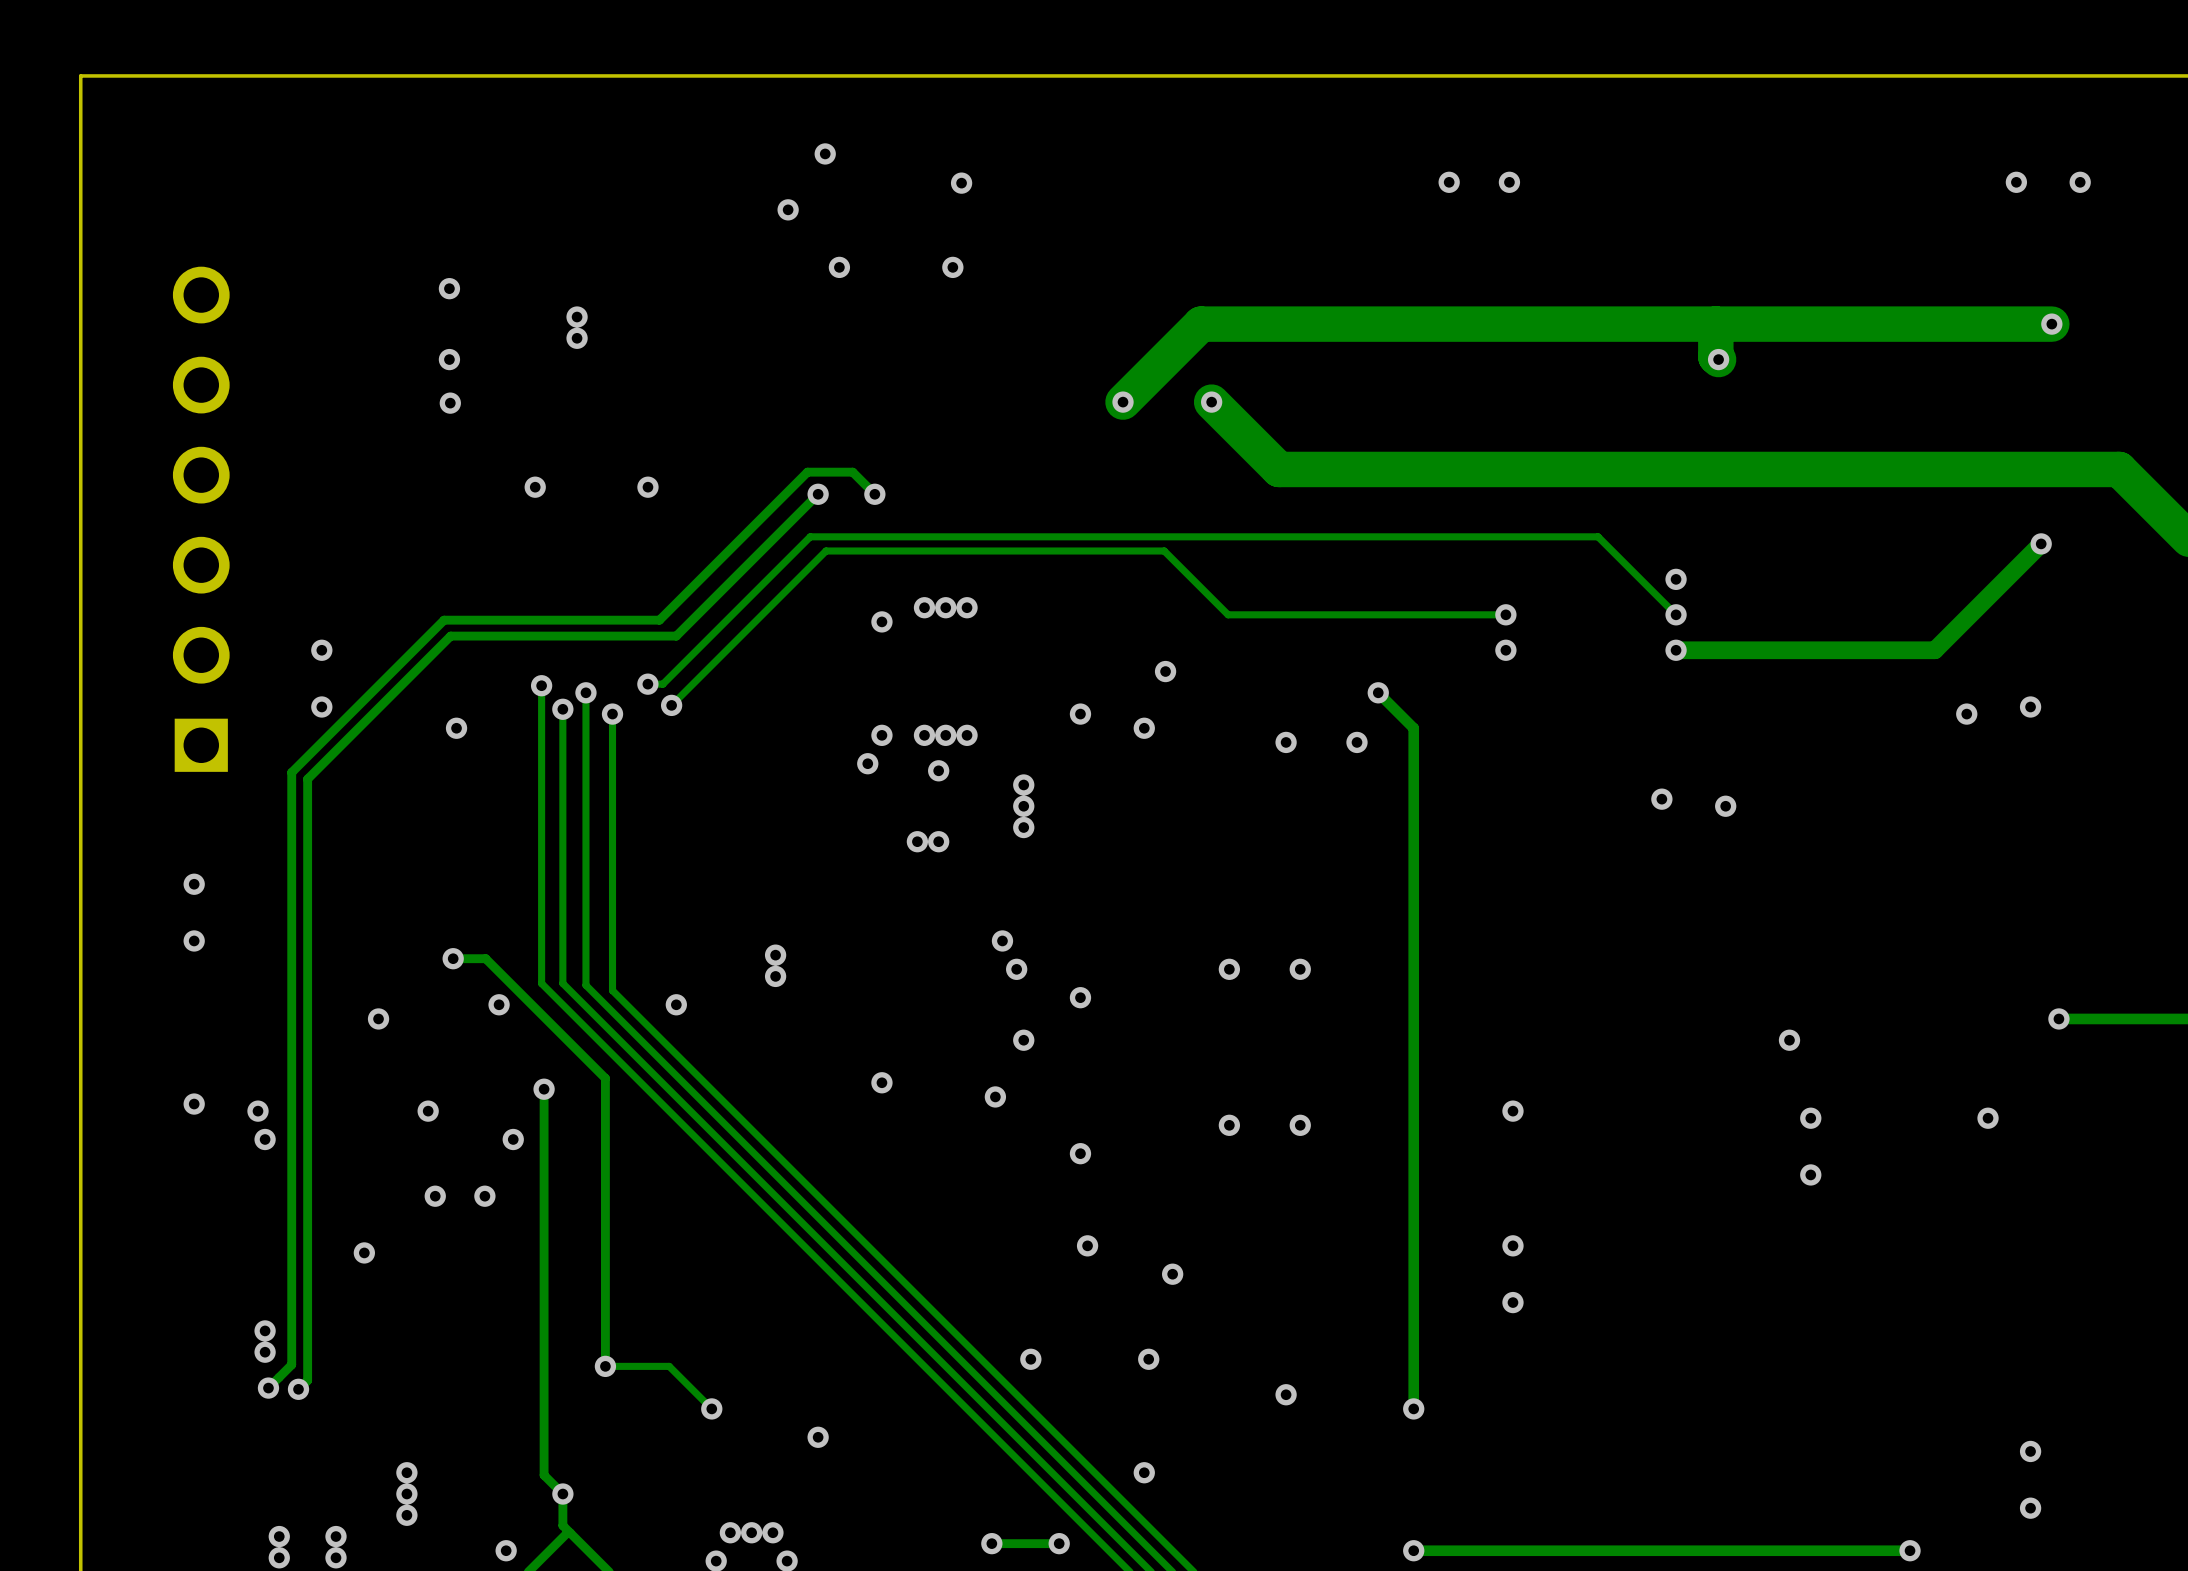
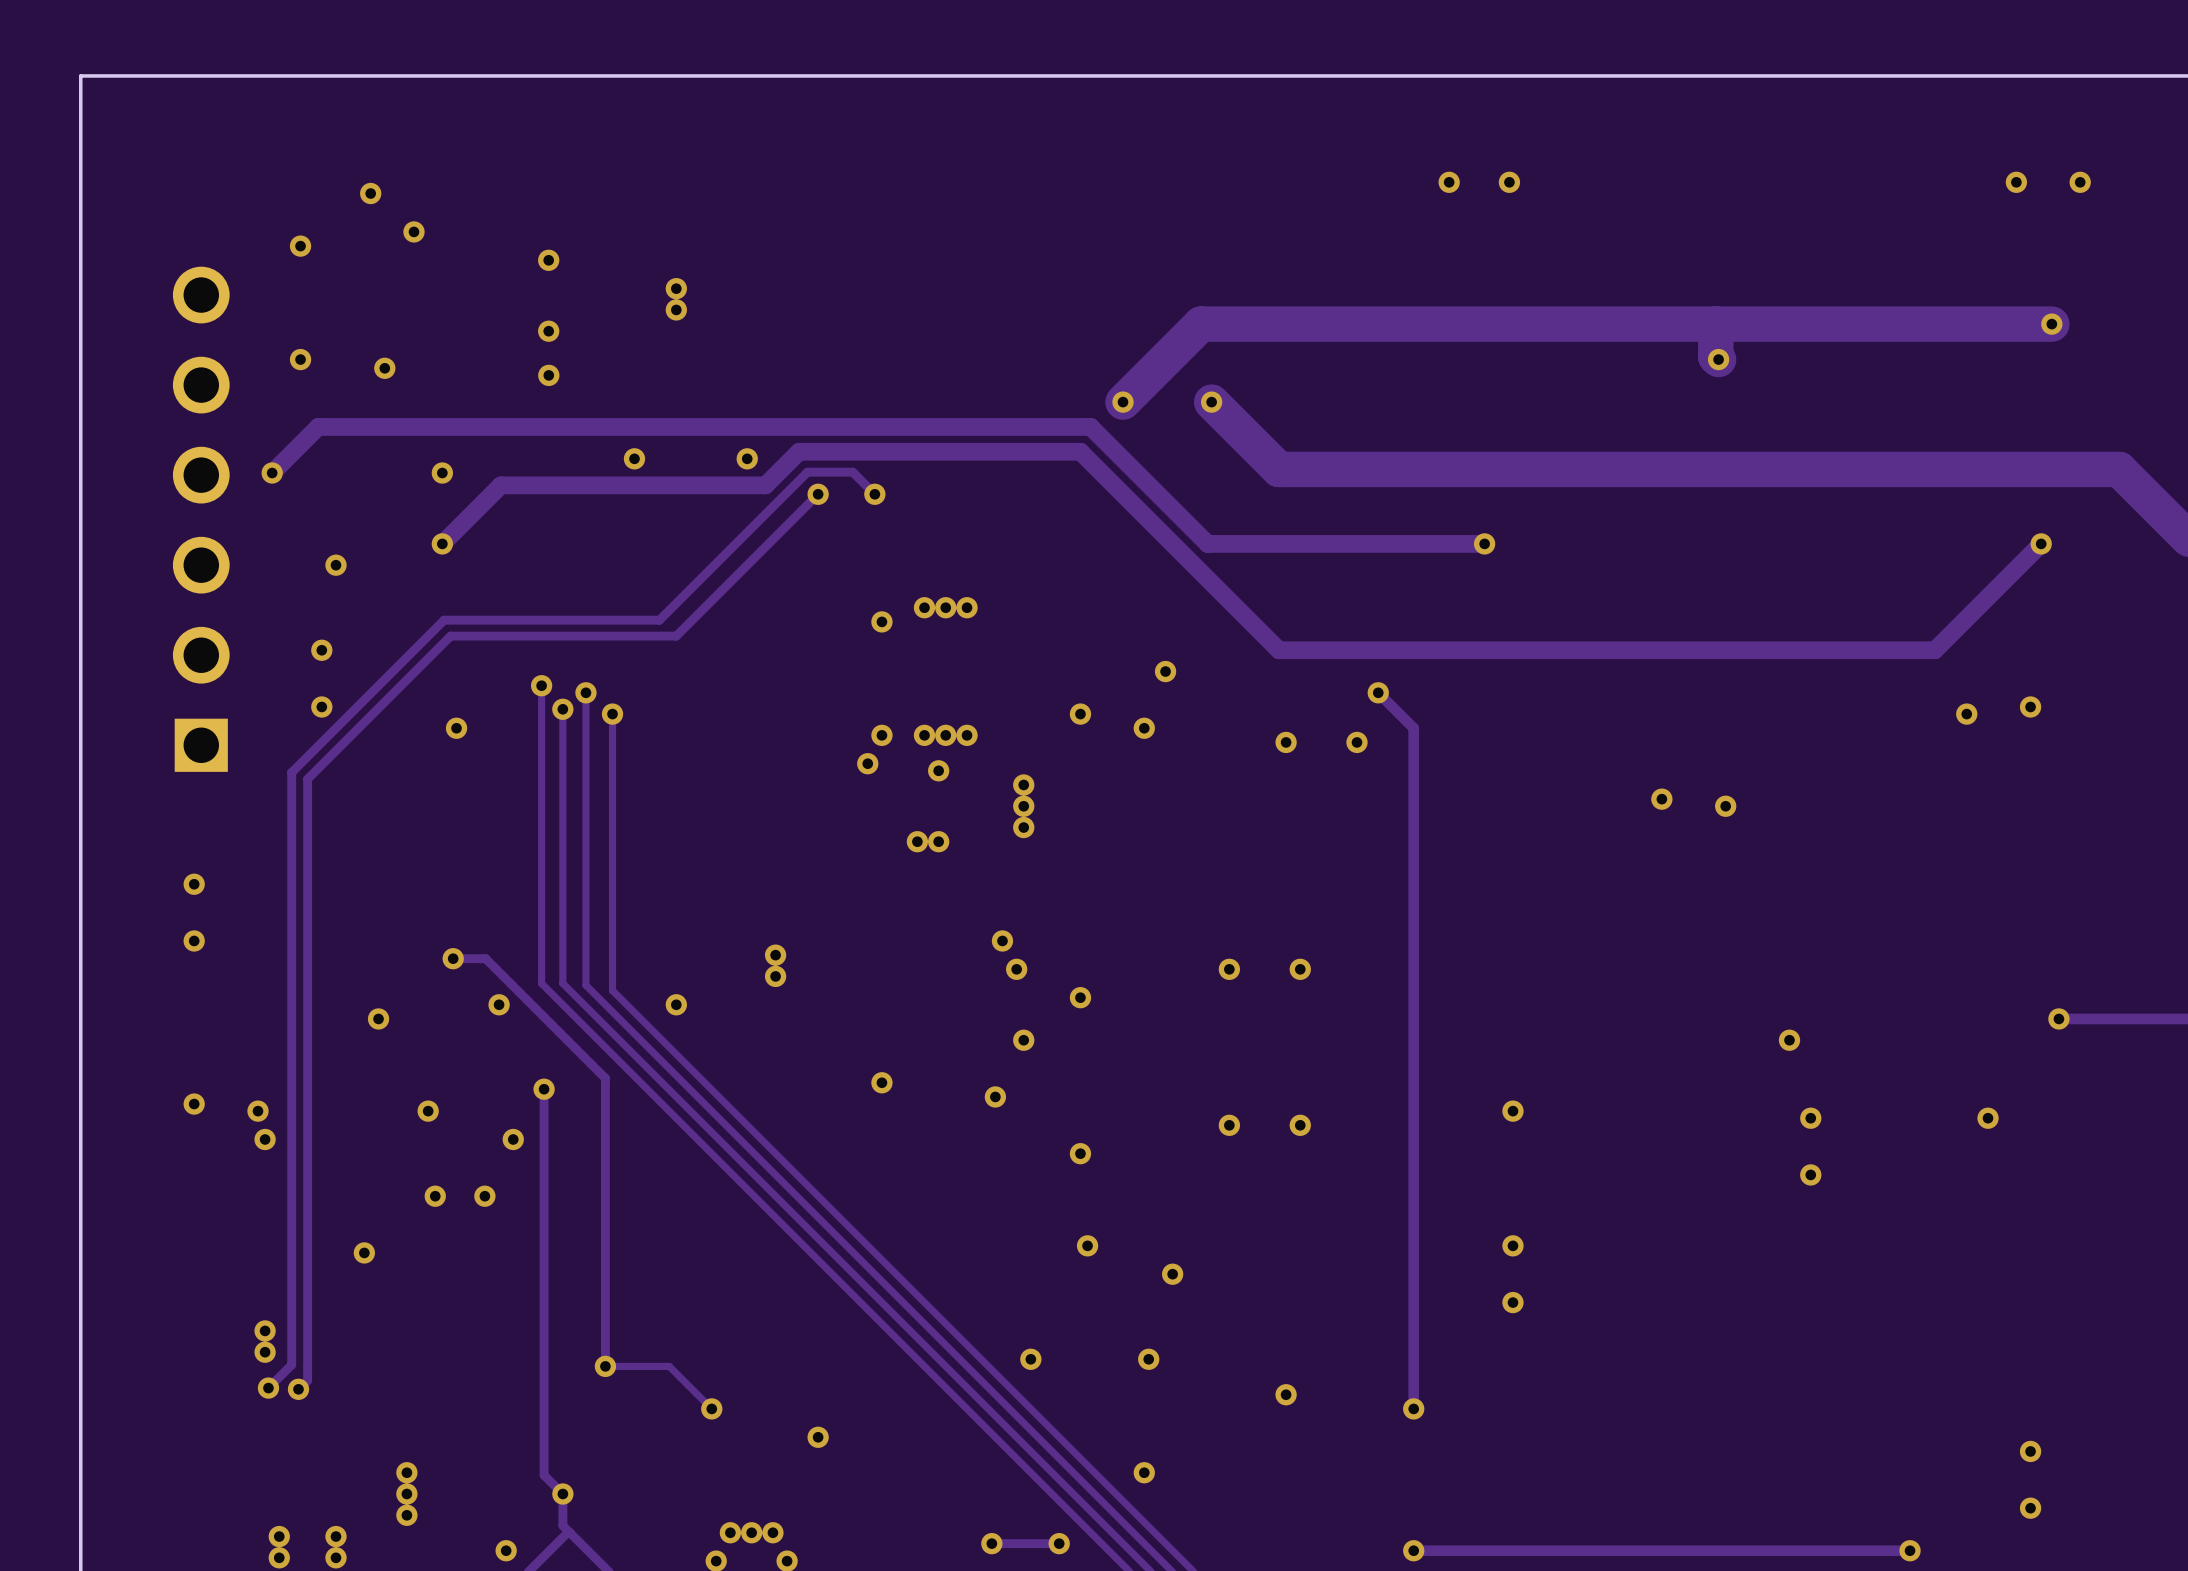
via: (825, 153) -> none
via: (961, 183) -> none
via: none -> (370, 193)
via: (788, 209) -> none
via: none -> (413, 231)
via: none -> (300, 246)
via: none -> (548, 260)
via: (839, 267) -> none
via: (952, 267) -> none
via: (449, 288) -> none
via: none -> (676, 288)
via: none -> (676, 309)
via: (577, 317) -> none
via: none -> (548, 331)
via: (577, 338) -> none
via: none -> (300, 359)
via: (449, 359) -> none
via: none -> (384, 368)
via: none -> (548, 375)
via: (450, 403) -> none
via: none -> (747, 458)
track: none -> (272, 473) (318, 426) (1090, 426) (1207, 543) (1484, 543)
via: none -> (272, 473)
via: none -> (442, 473)
via: (535, 487) -> none
via position: (647, 487) -> (634, 458)
track: none -> (442, 543) (500, 485) (765, 485) (799, 451) (1080, 451) (1279, 650) (1676, 650)
via: none -> (442, 543)
via: none -> (1484, 543)
via: none -> (335, 565)
via: (1676, 579) -> none
track: (1505, 614) (1228, 614) (1164, 551) (826, 551) (671, 705) -> none
via: (1505, 614) -> none
track: (1676, 614) (1598, 536) (810, 536) (662, 684) (647, 684) -> none
via: (1676, 614) -> none
via: (1505, 650) -> none
via: (1676, 650) -> none
via: (647, 684) -> none
via: (671, 705) -> none

